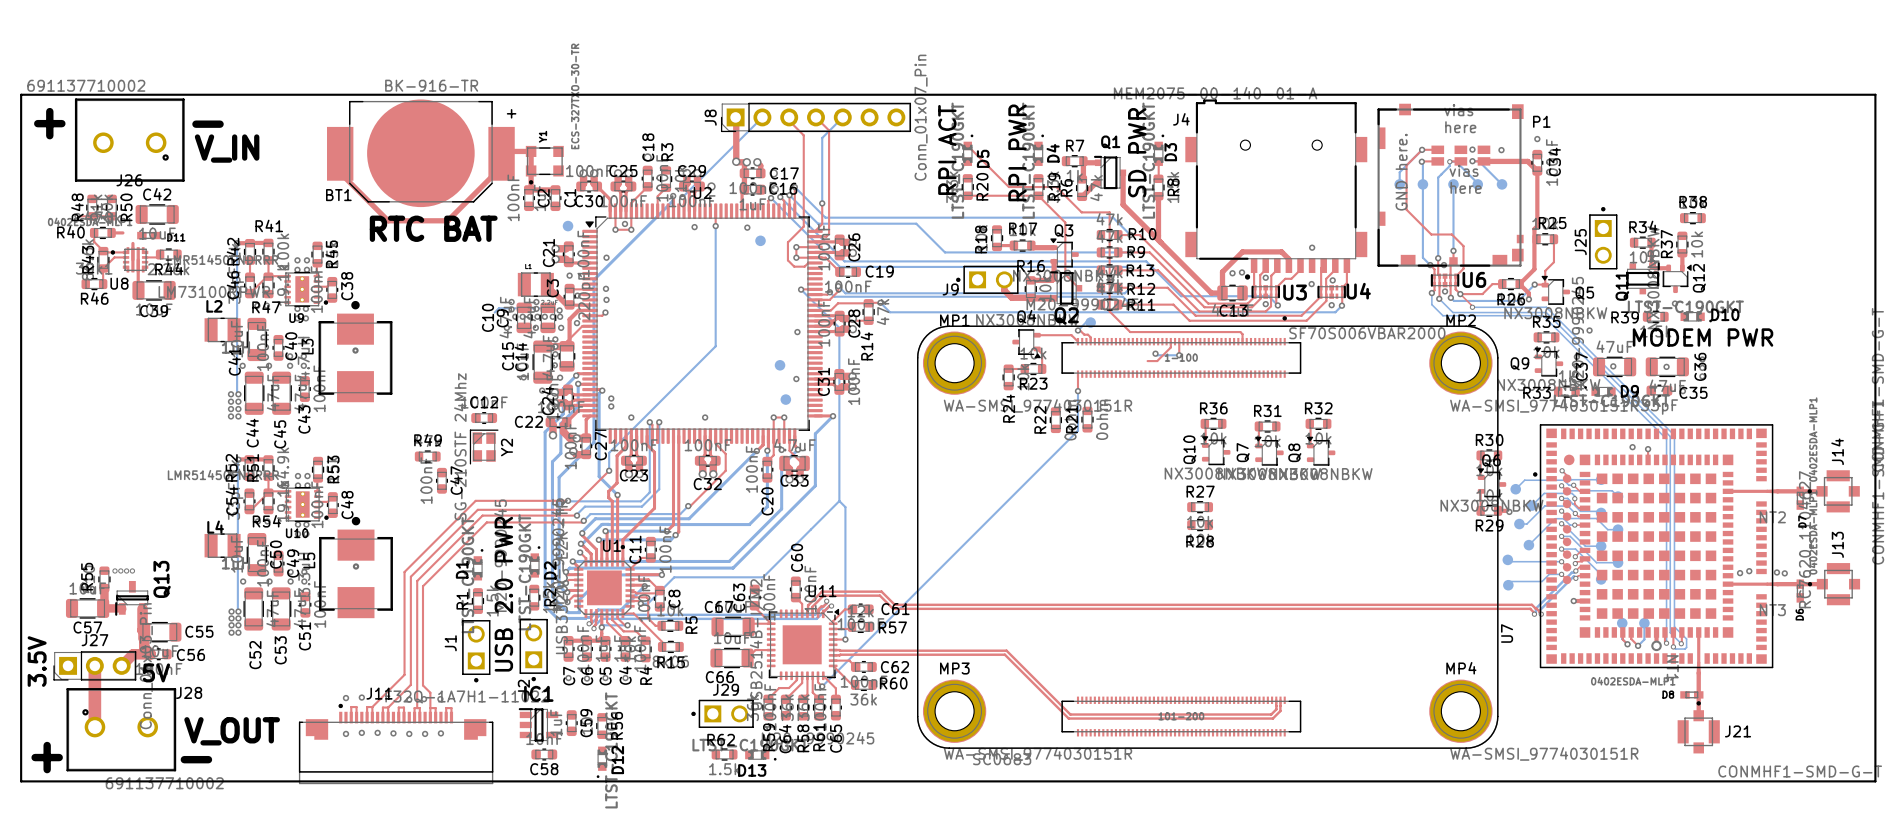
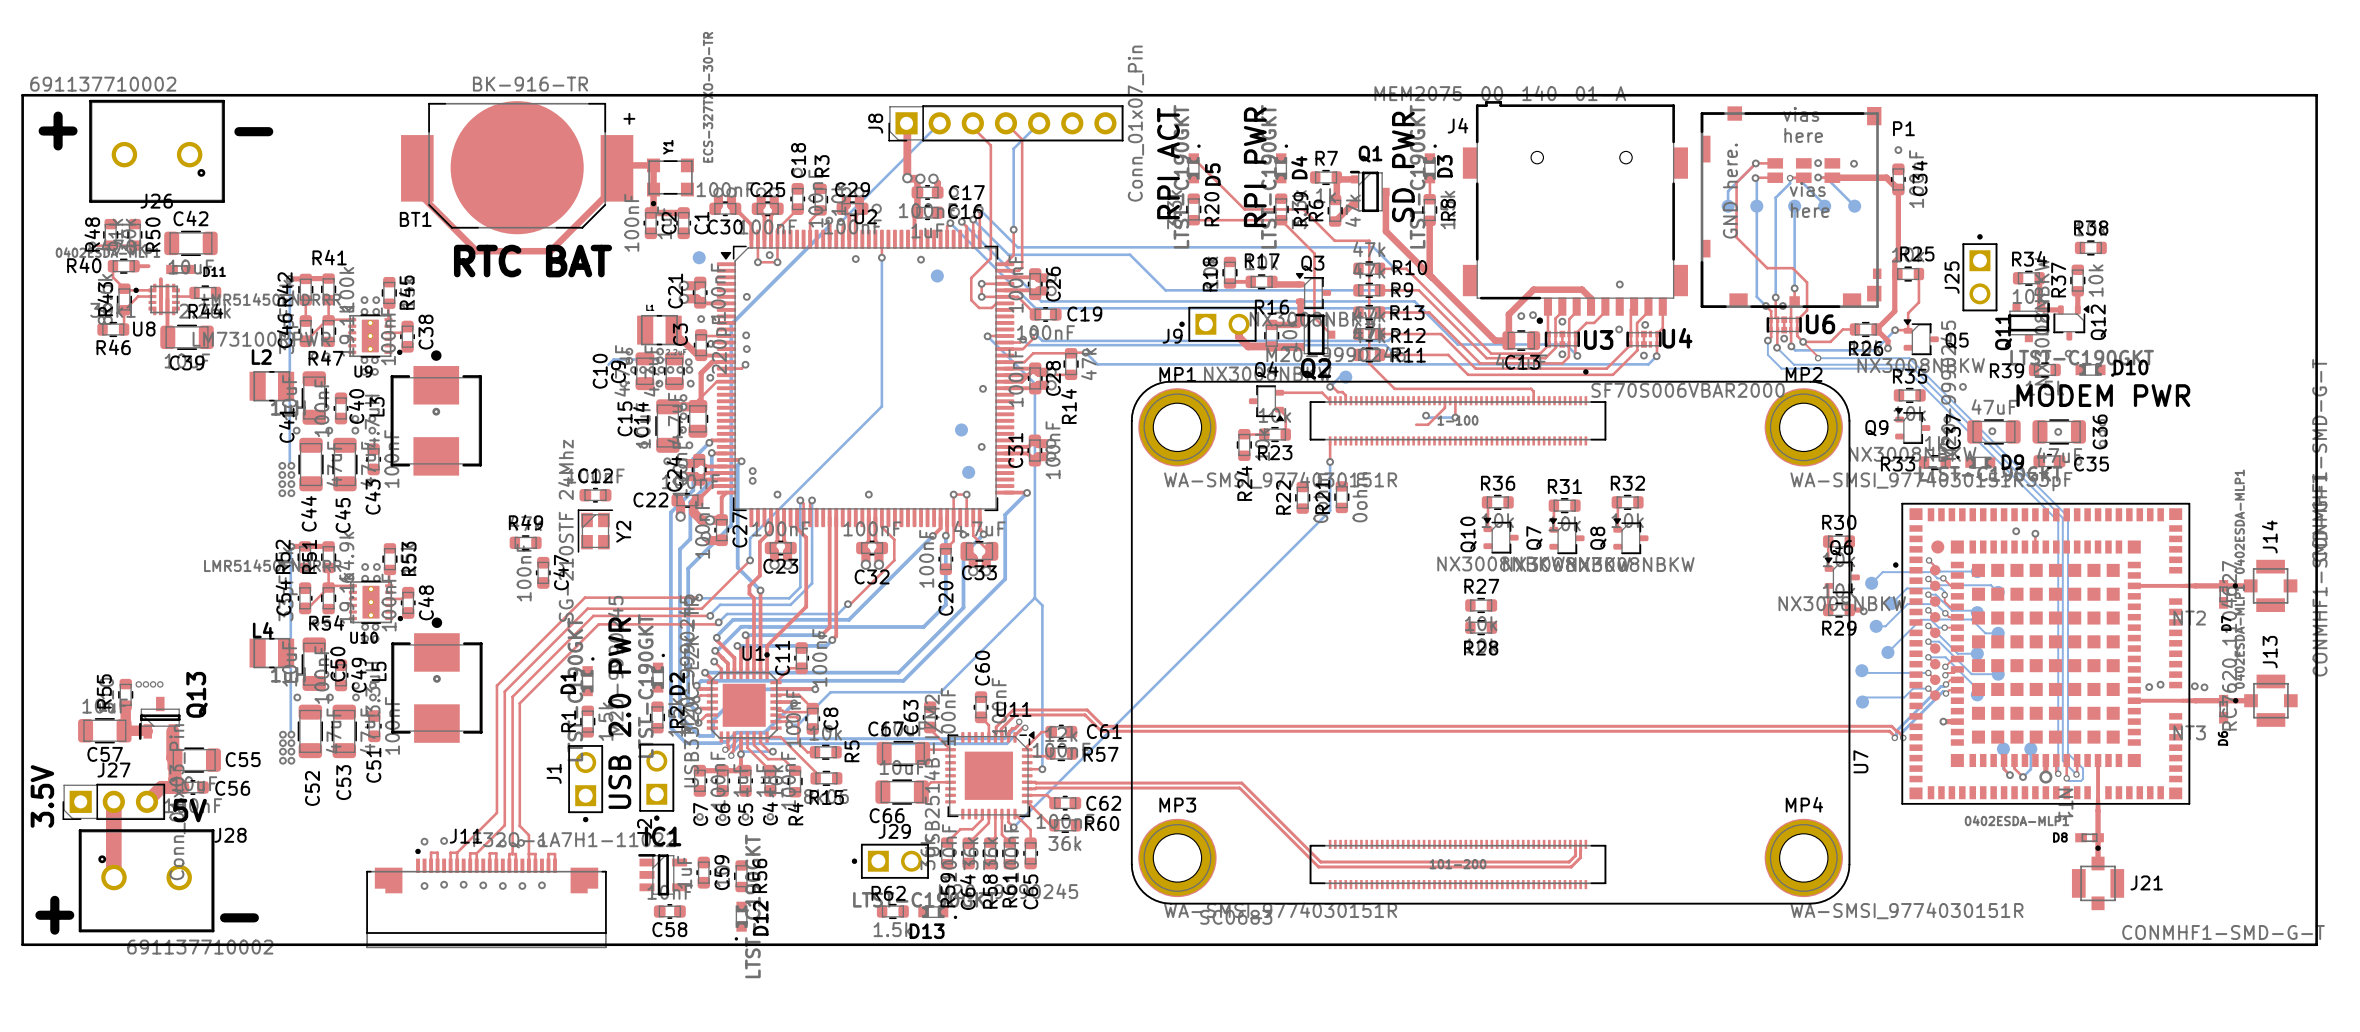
text: V_IN (227, 148) -> none
text: V_OUT (232, 731) -> none

